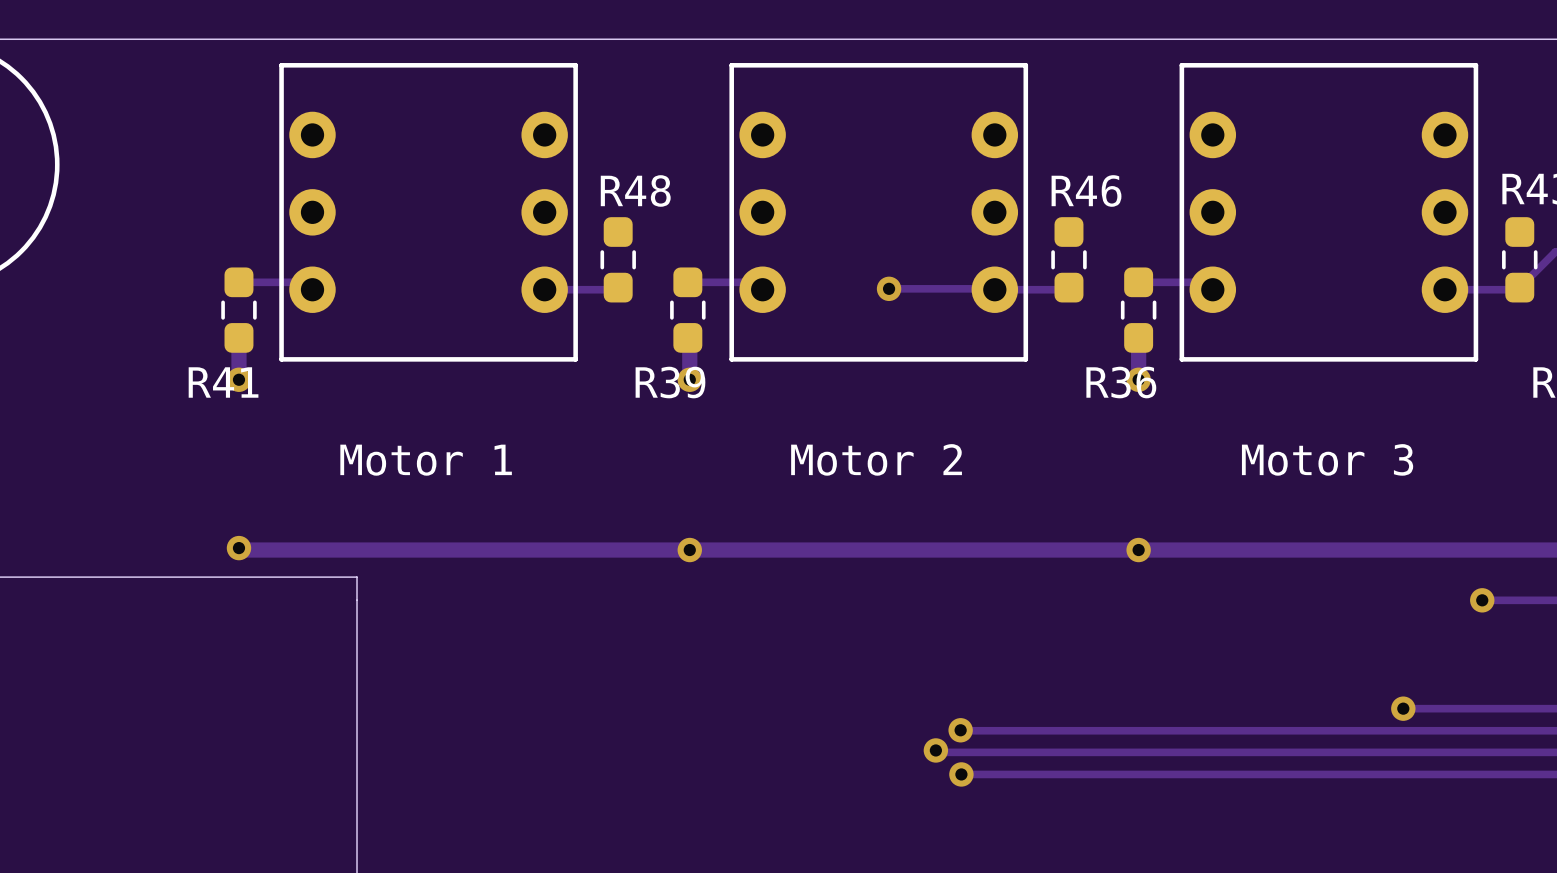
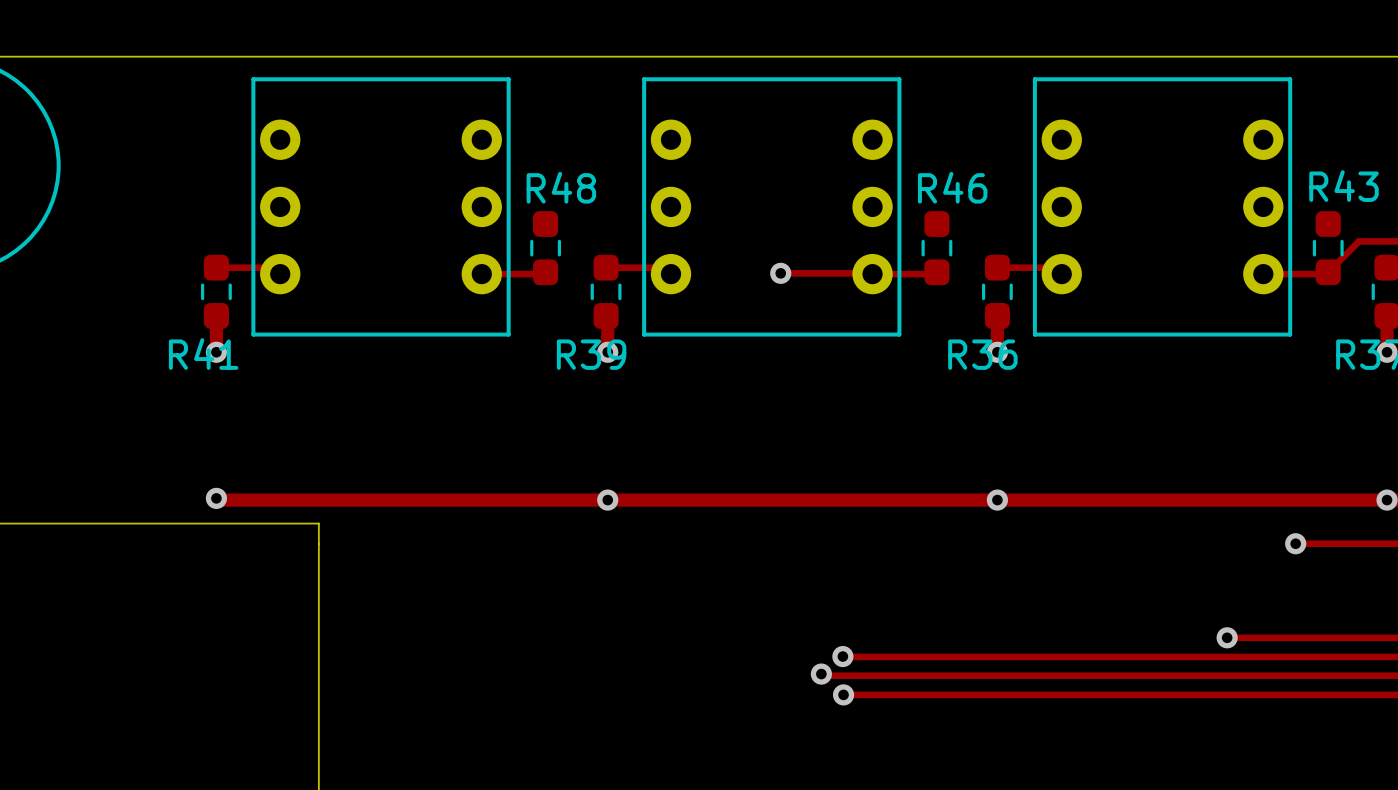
text: Motor 2 (876, 459) -> none
text: Motor 3 (1327, 459) -> none
text: Motor 1 (426, 460) -> none

